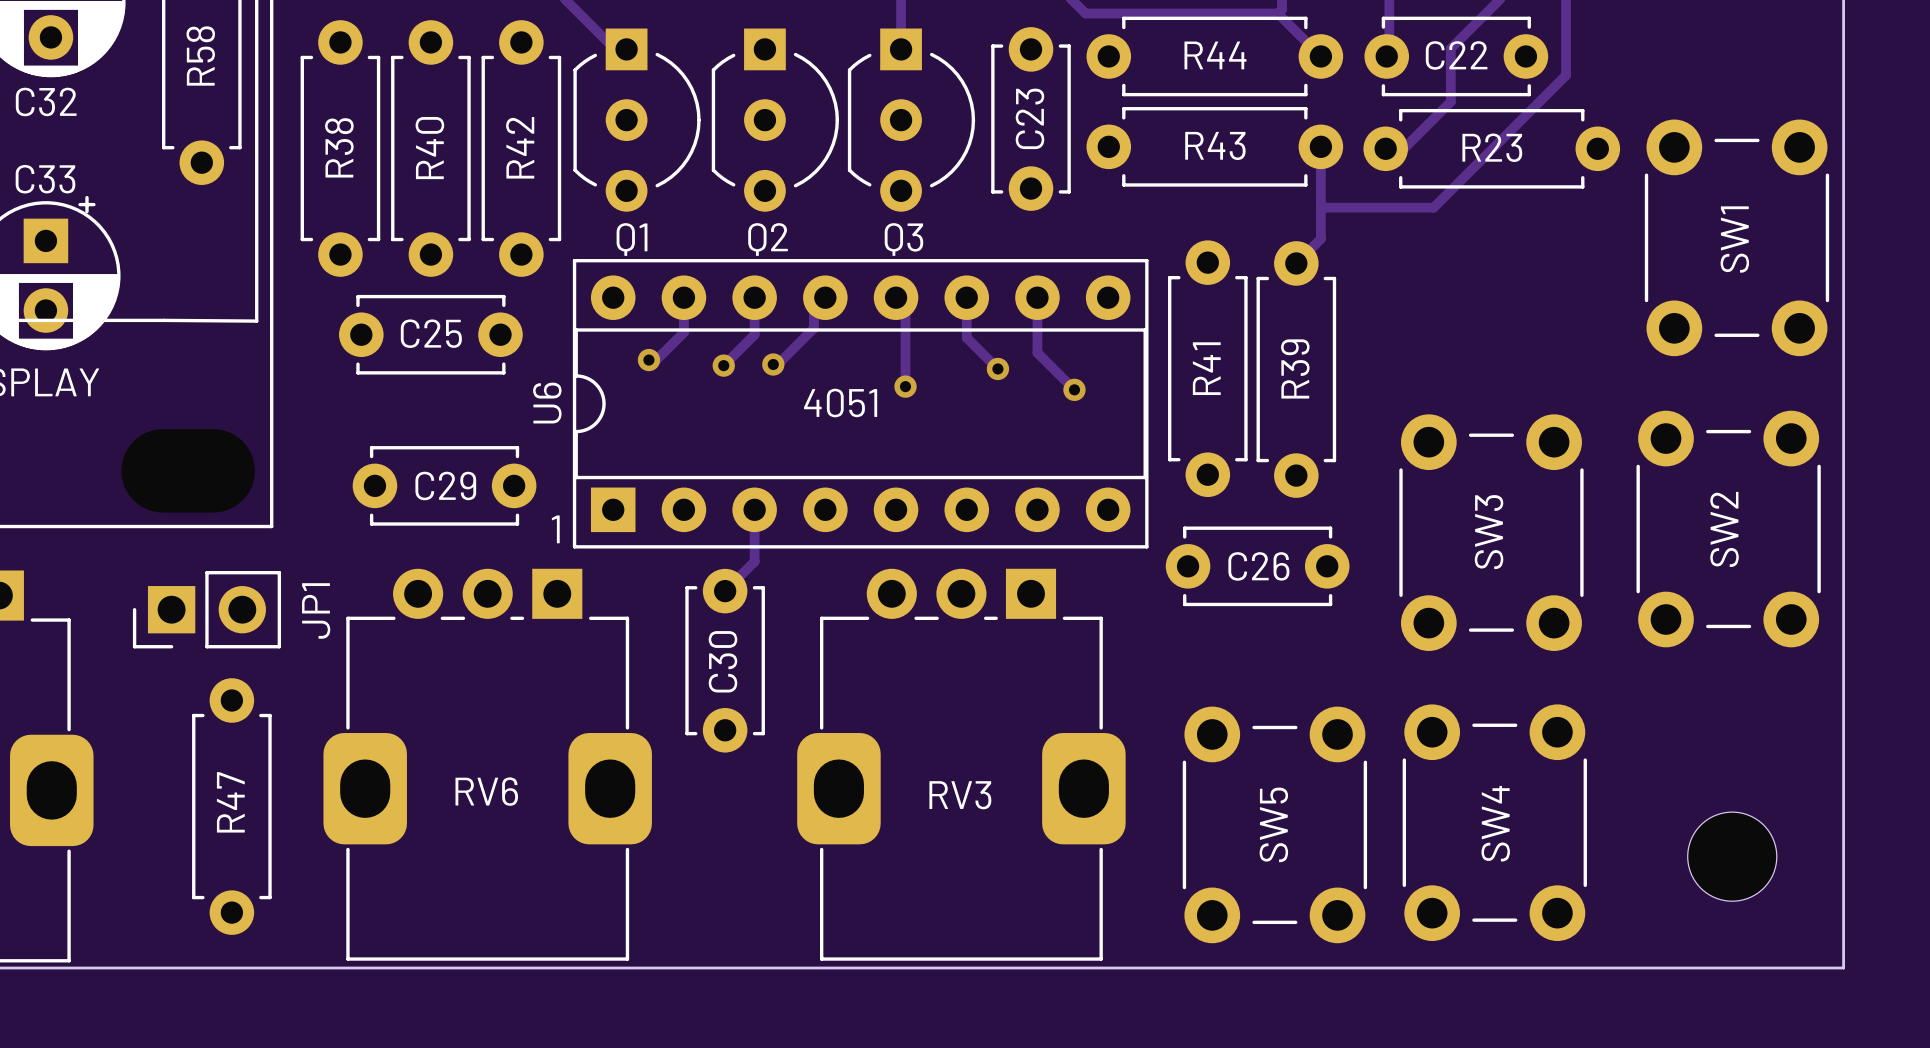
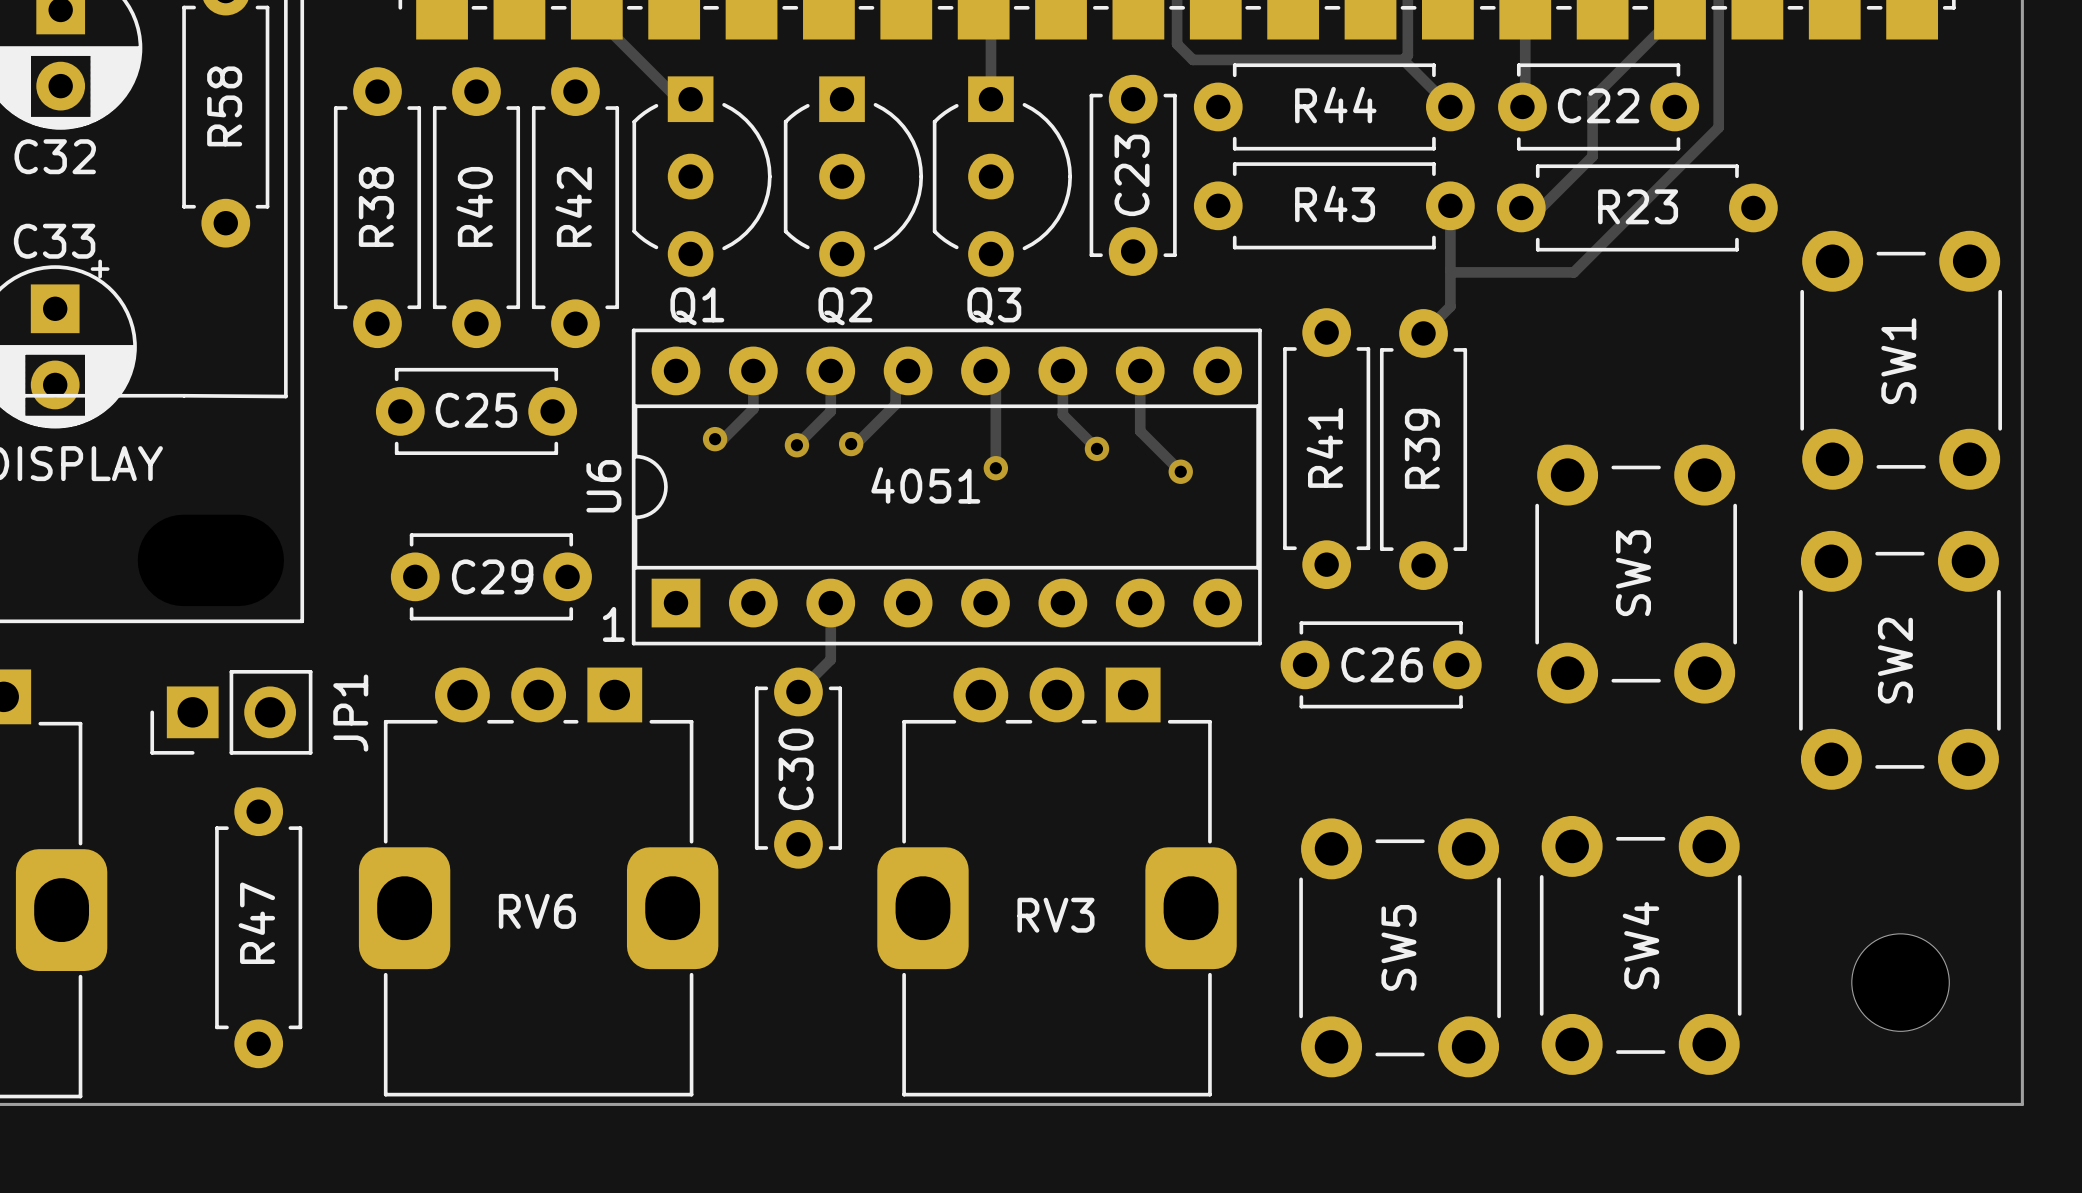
SW1 position: (1736, 237) -> (1901, 360)
SW2 position: (1728, 529) -> (1899, 660)
SW3 position: (1491, 532) -> (1636, 574)

